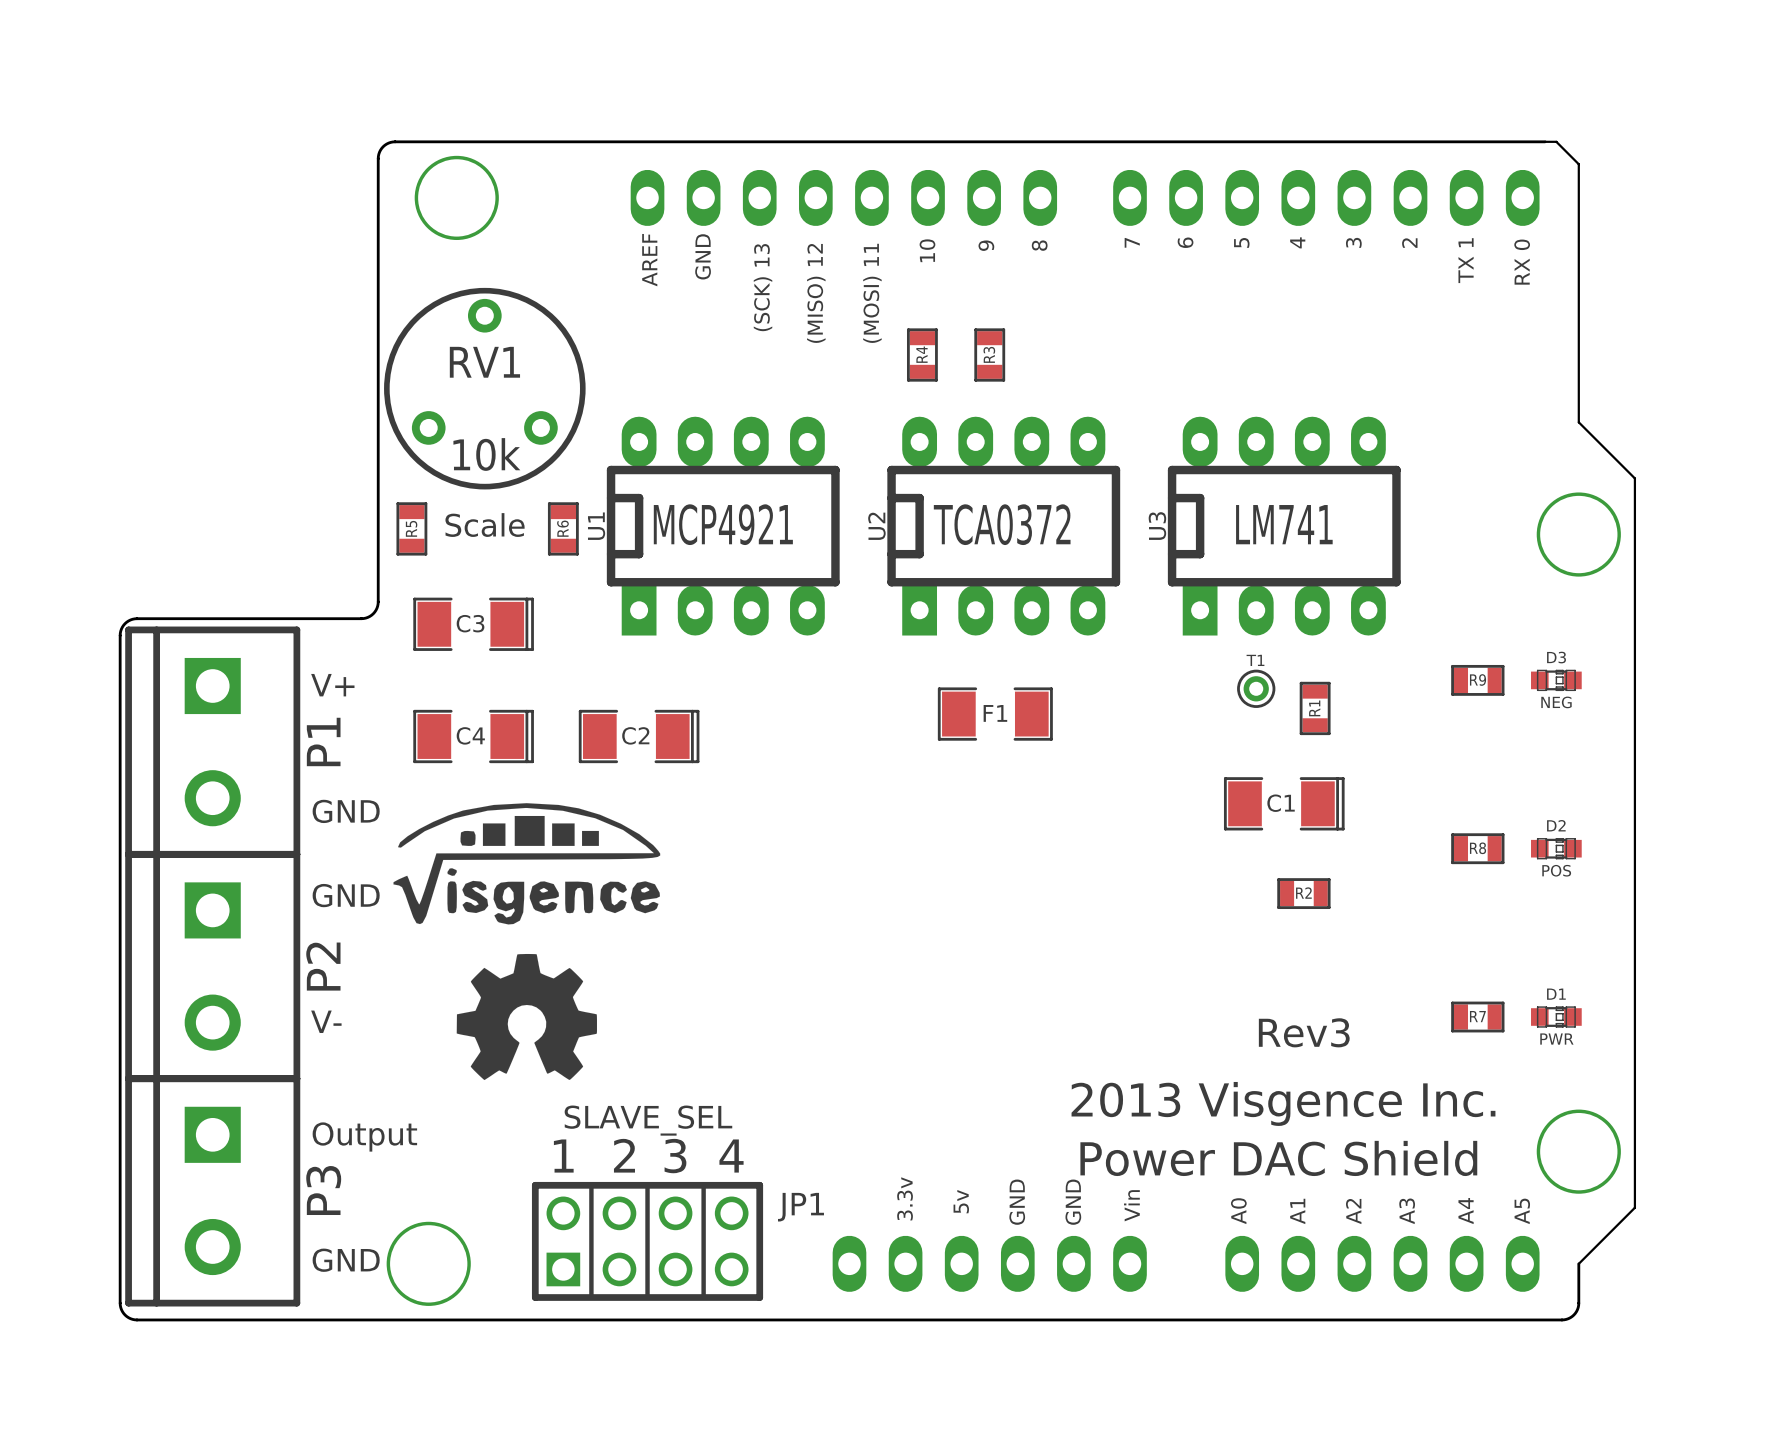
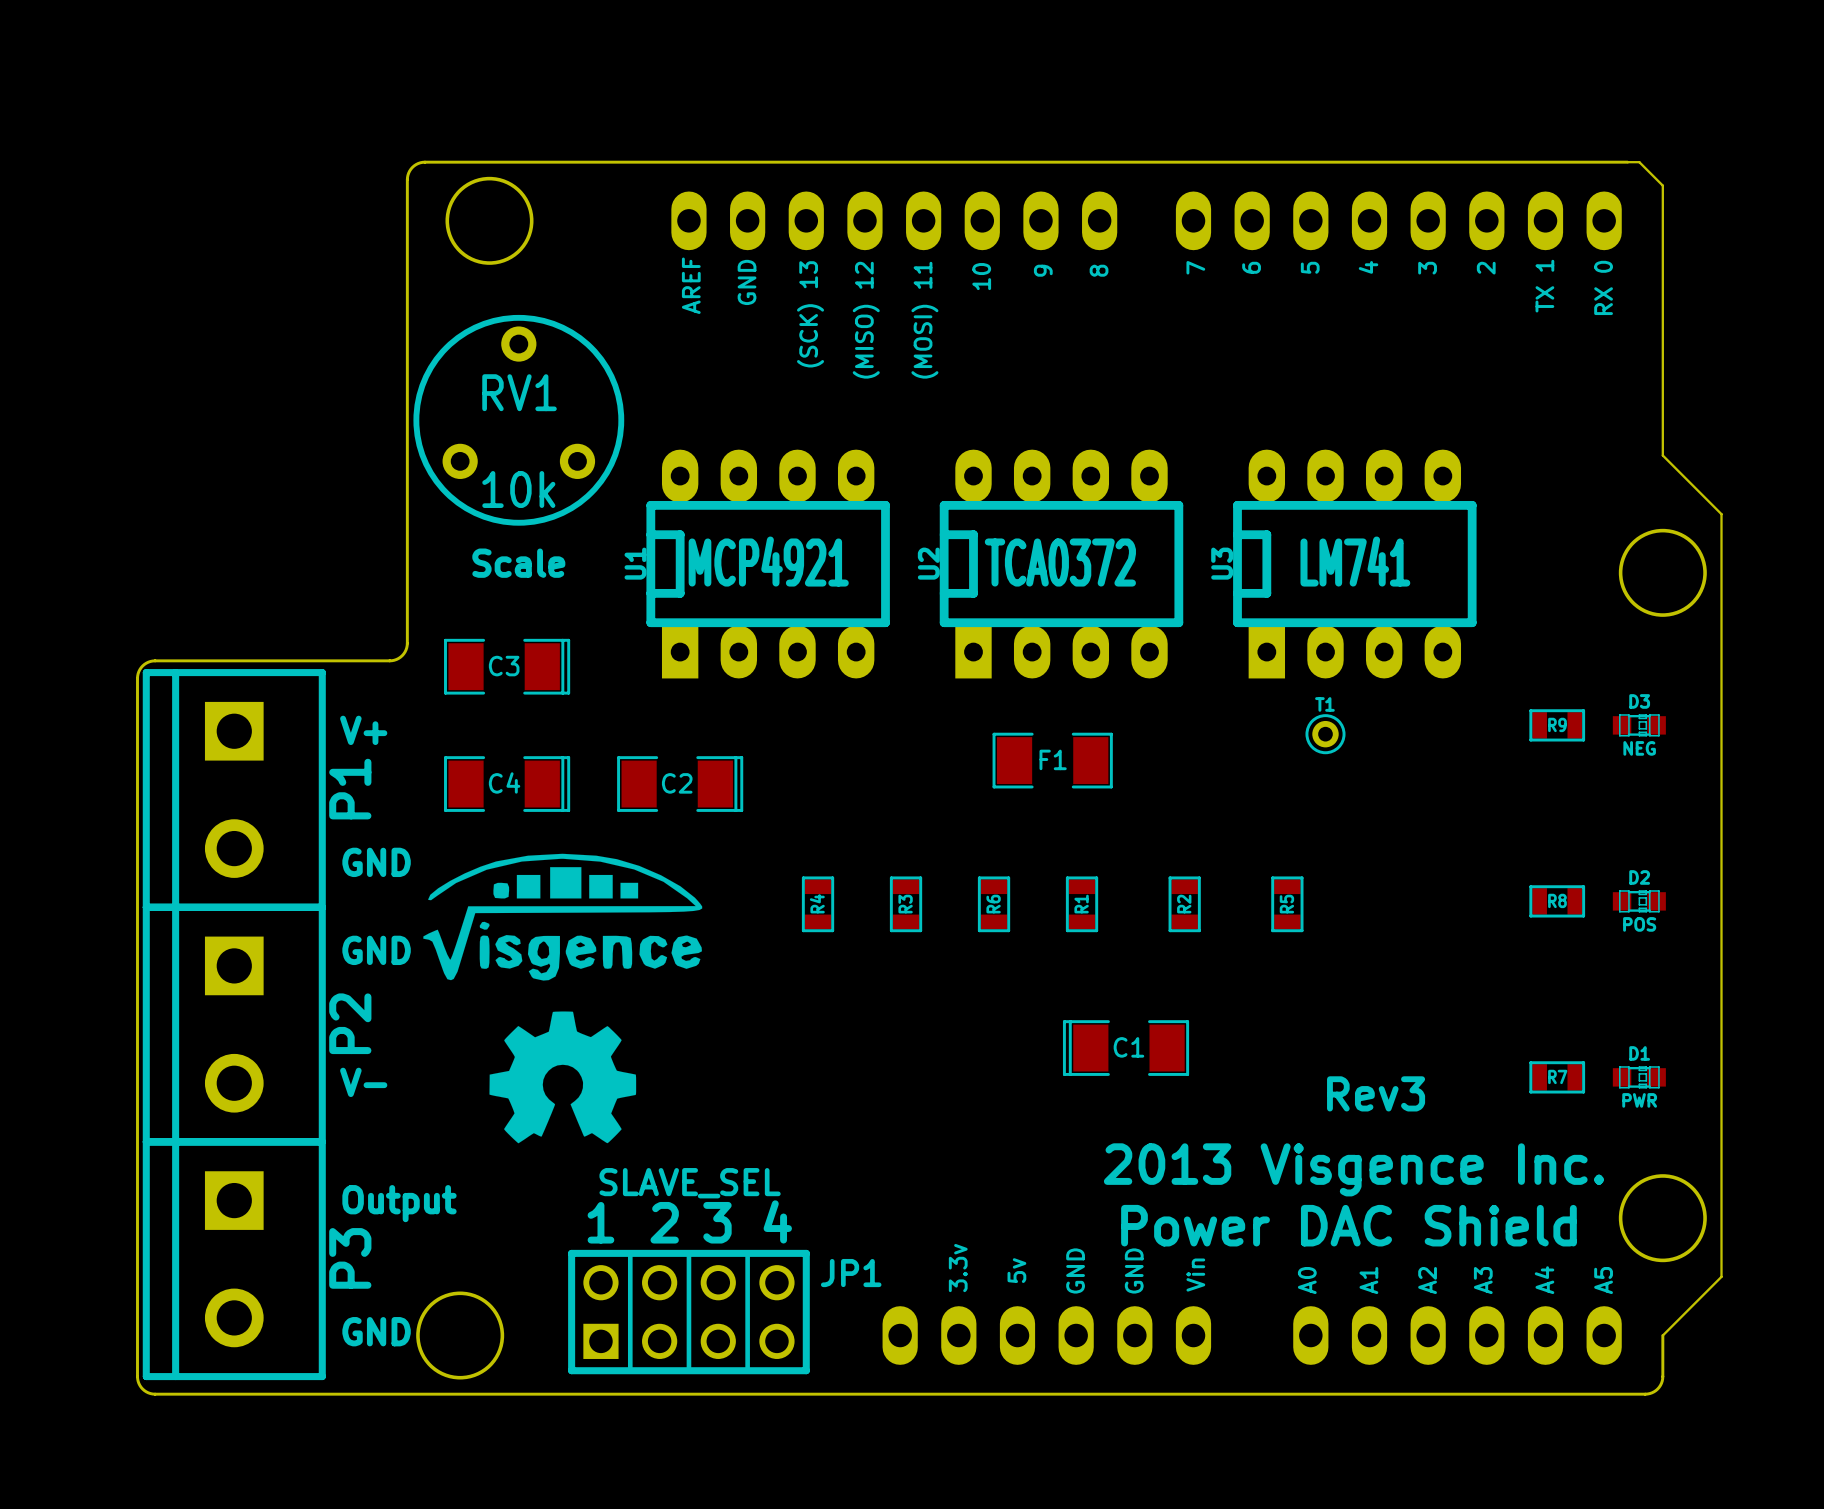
R4 position: (922, 355) -> (818, 904)
R3 position: (989, 355) -> (906, 904)
R5 position: (411, 528) -> (1287, 904)
R6 position: (563, 528) -> (994, 904)
R1 position: (1315, 708) -> (1082, 904)
C1 rotation: 0° (1284, 803) -> 180° (1126, 1048)
C1 position: (1284, 803) -> (1126, 1048)
R2 rotation: 0° (1303, 893) -> 90° clockwise (1184, 904)
R2 position: (1303, 893) -> (1184, 904)

